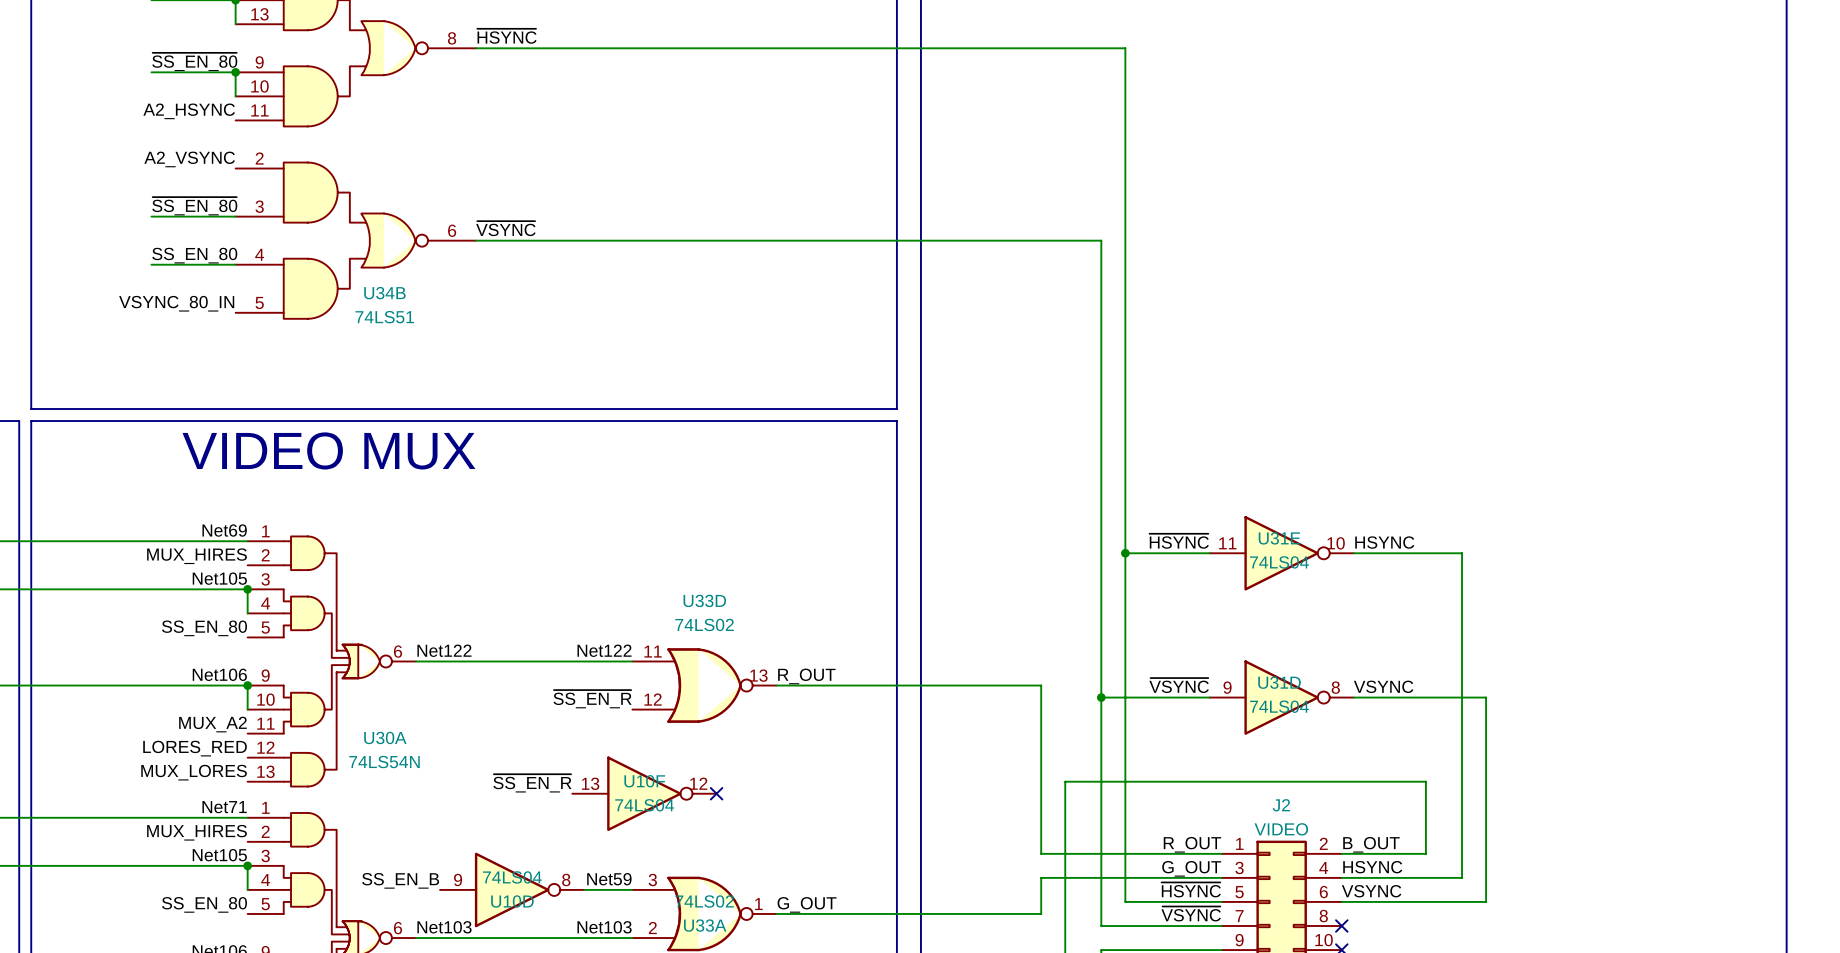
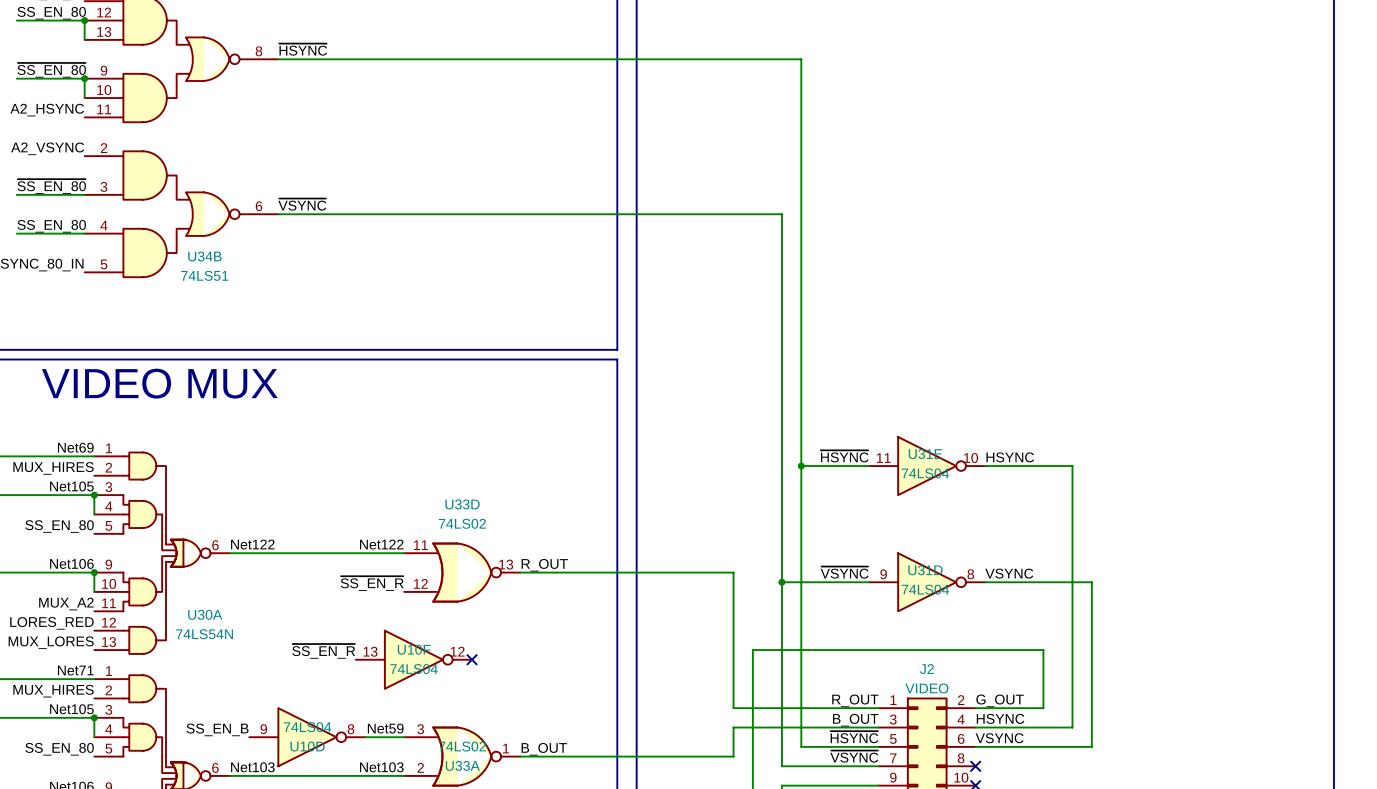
label: B_OUT (1371, 844) -> G_OUT (1000, 700)
label: G_OUT (1191, 868) -> B_OUT (855, 720)
label: G_OUT (807, 904) -> B_OUT (544, 749)

